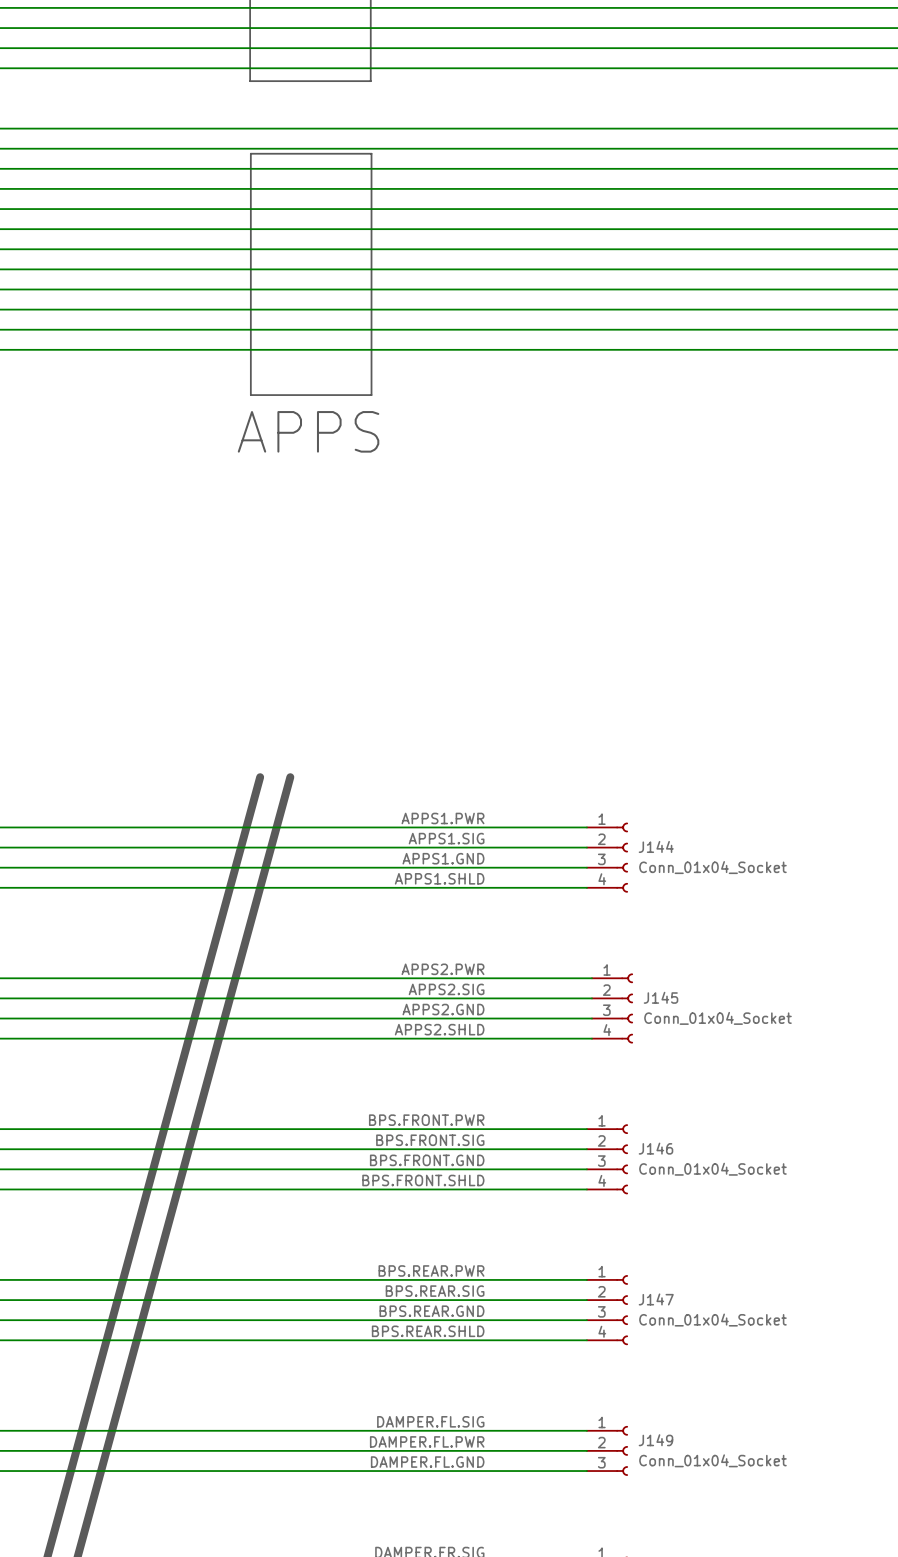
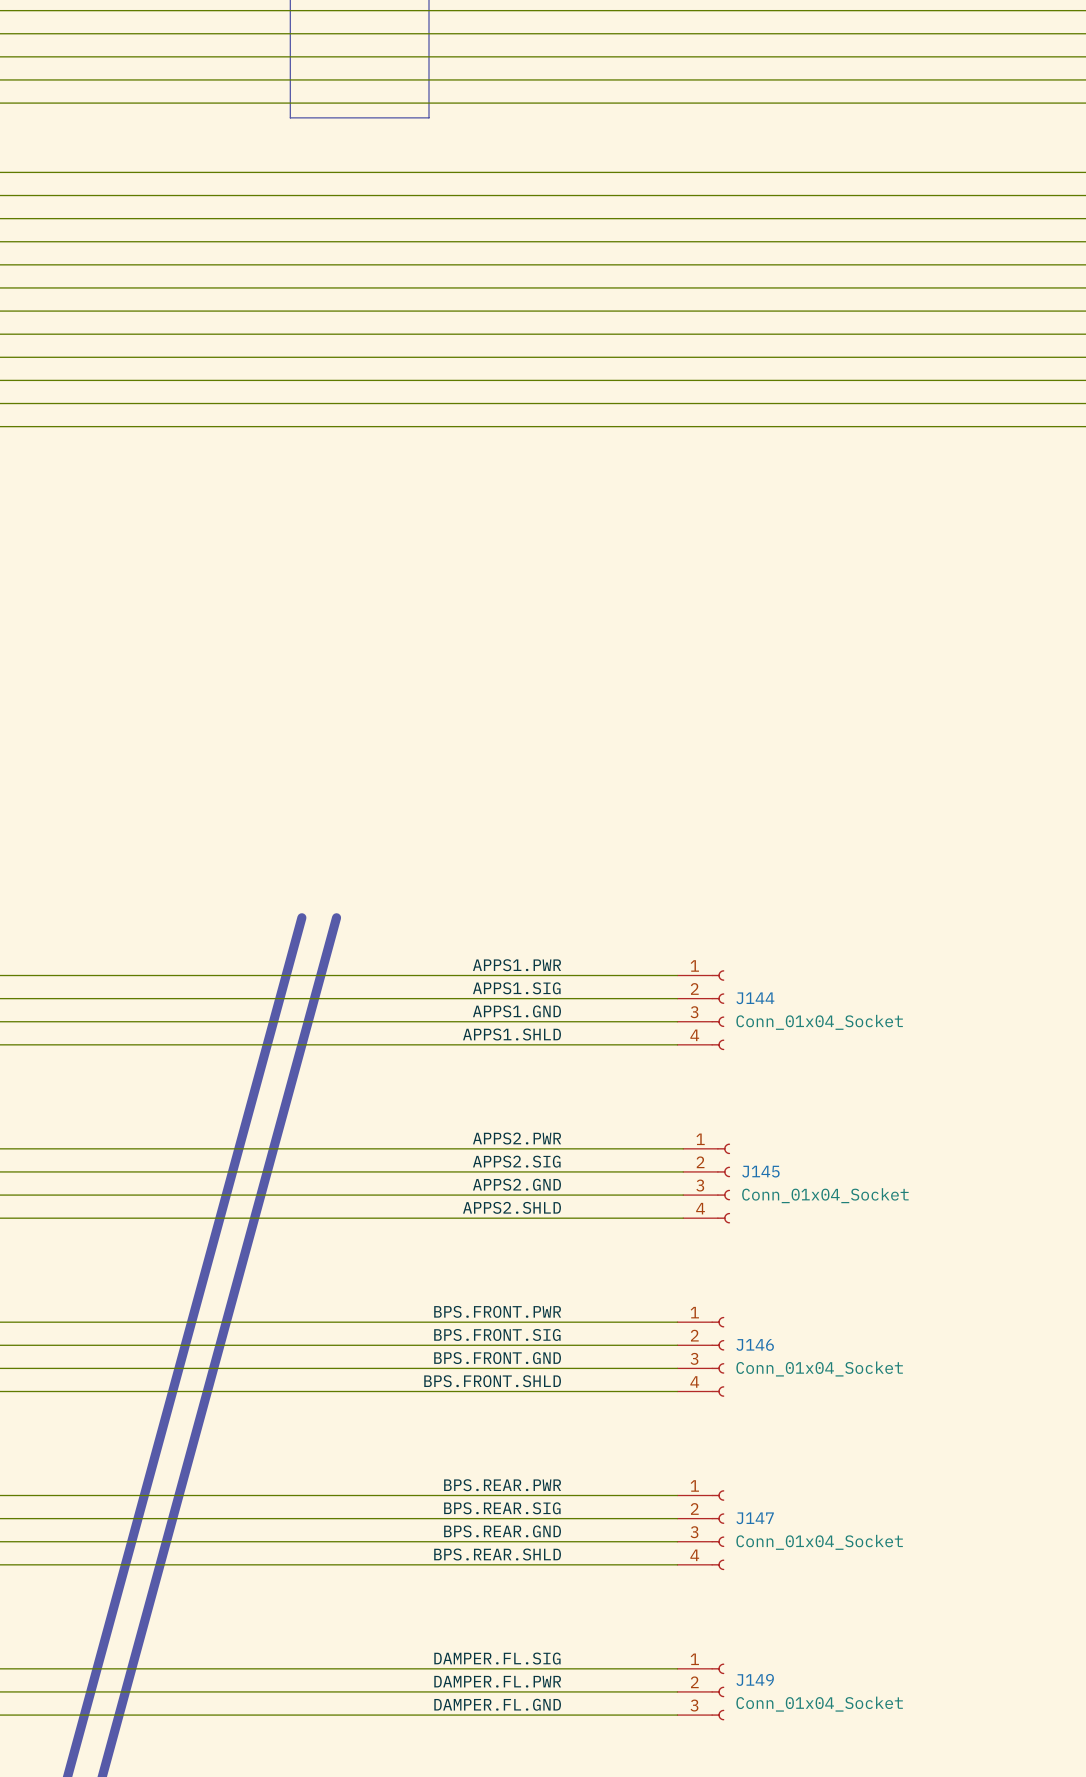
line: (250, 153) (371, 153) (371, 395) (250, 395) (250, 153) -> none
text: APPS (308, 431) -> none

